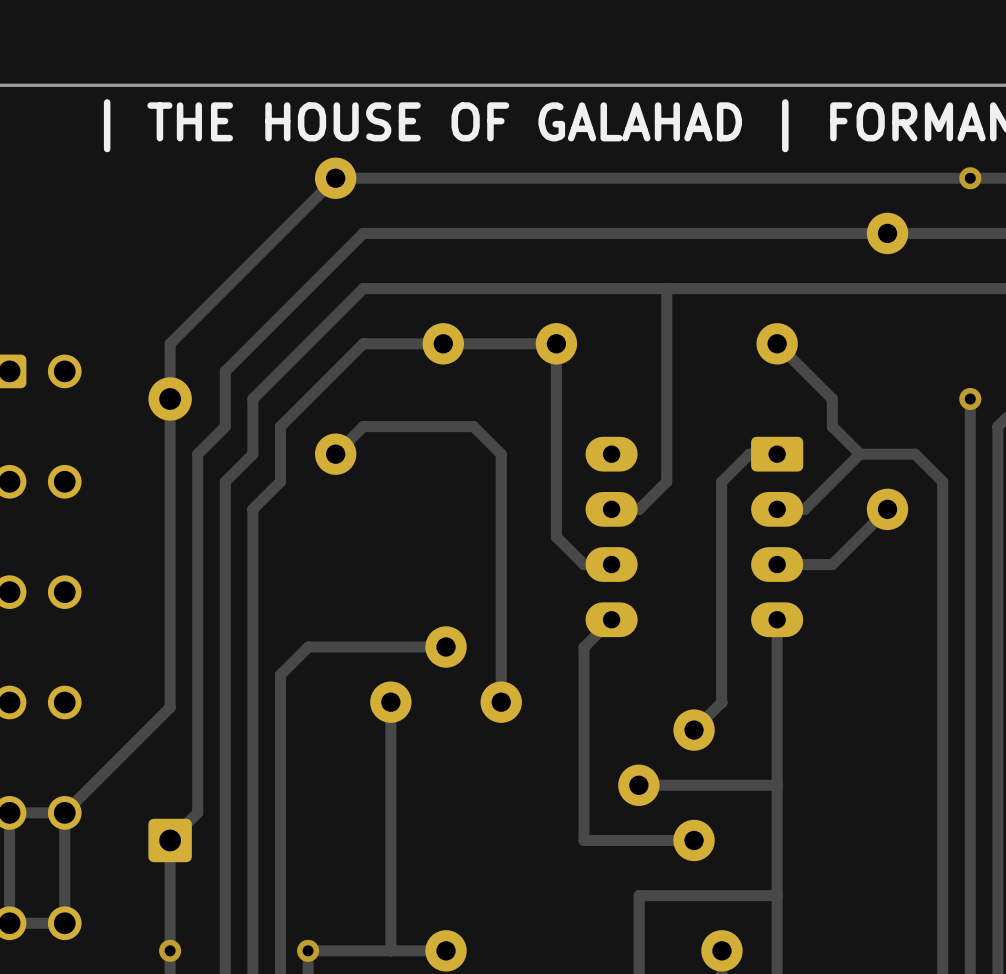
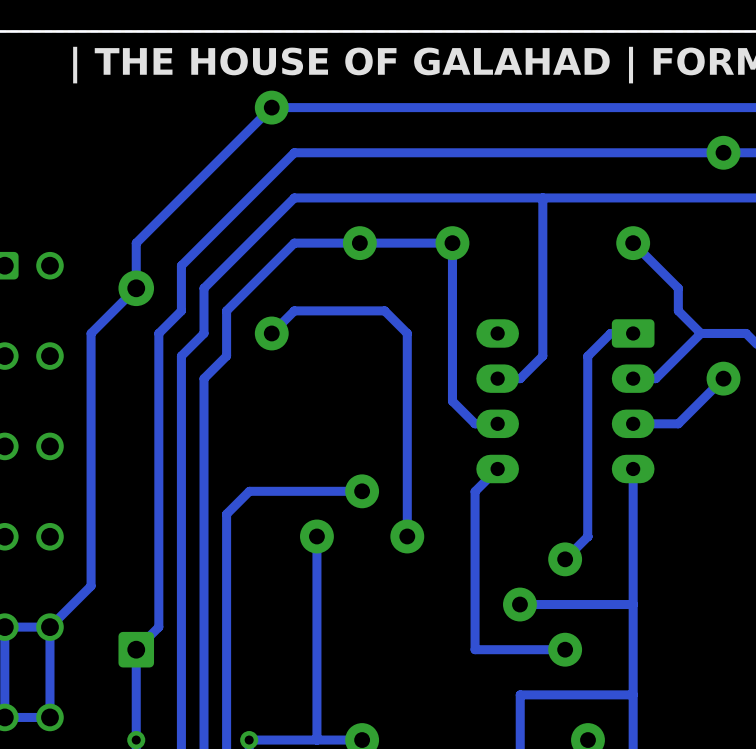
track: (170, 398) (170, 707) (114, 762) -> (136, 288) (91, 333) (91, 586)

